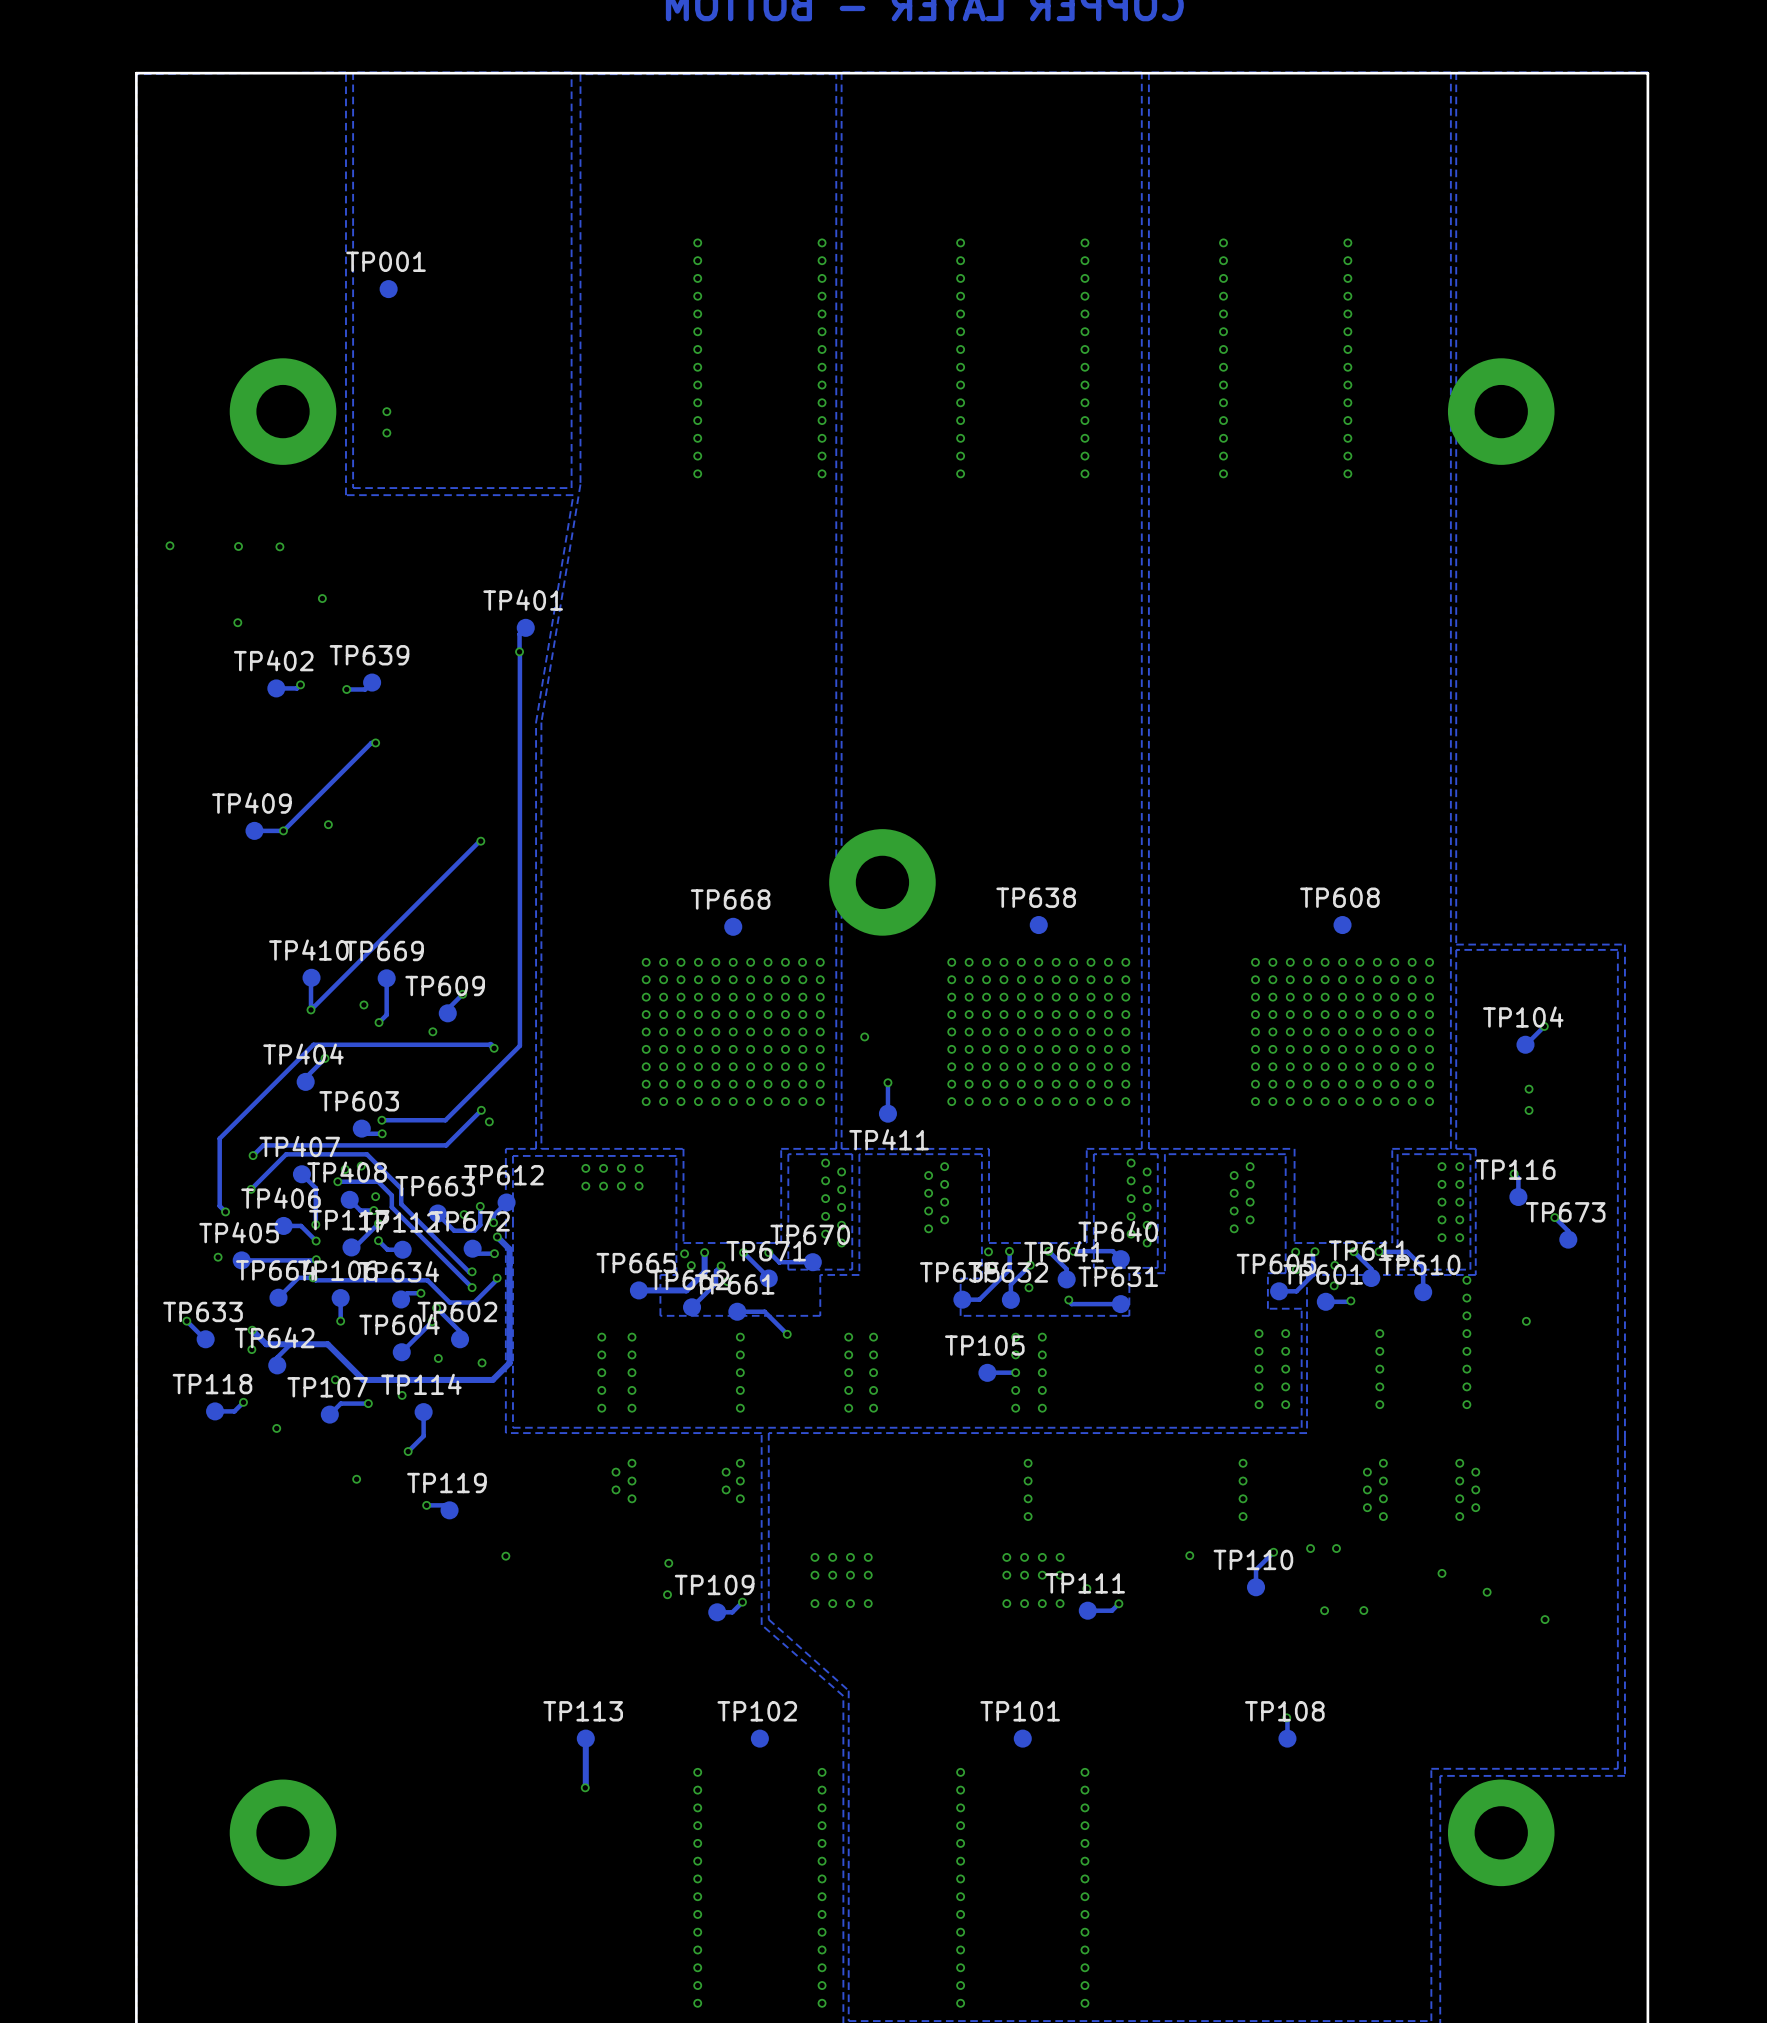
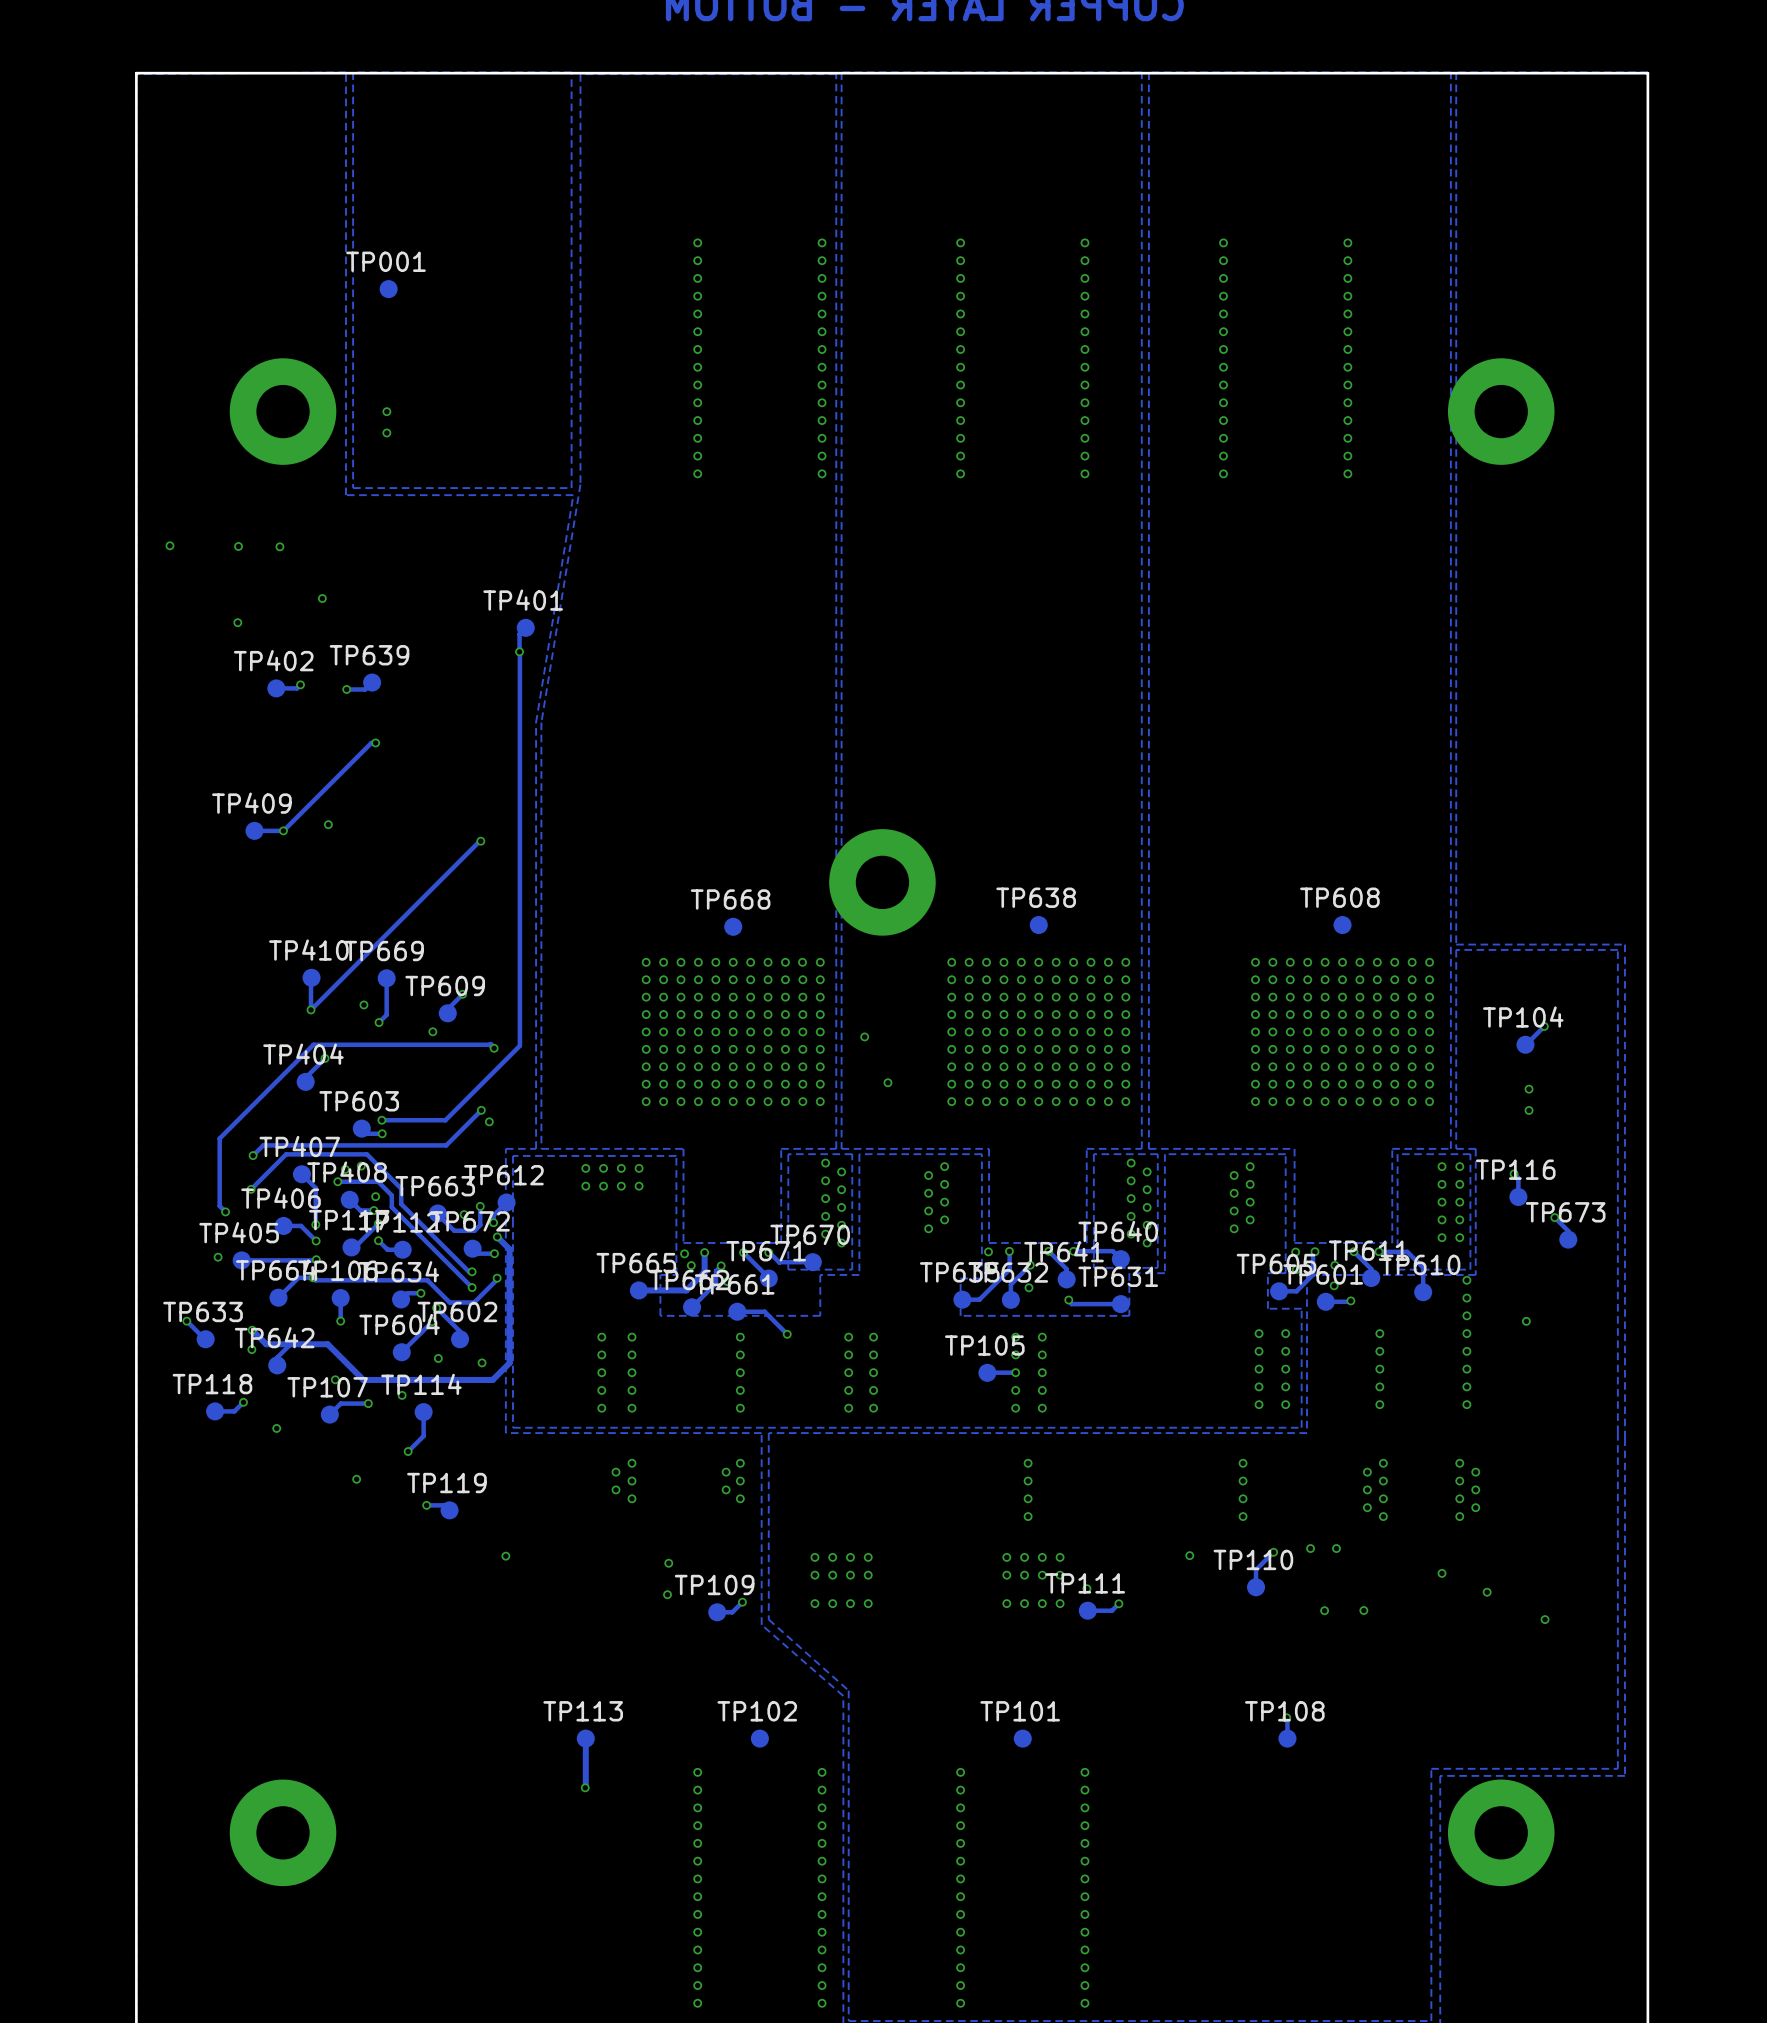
track: (887, 1082) (887, 1113) -> none
TP411: (887, 1113) -> none

